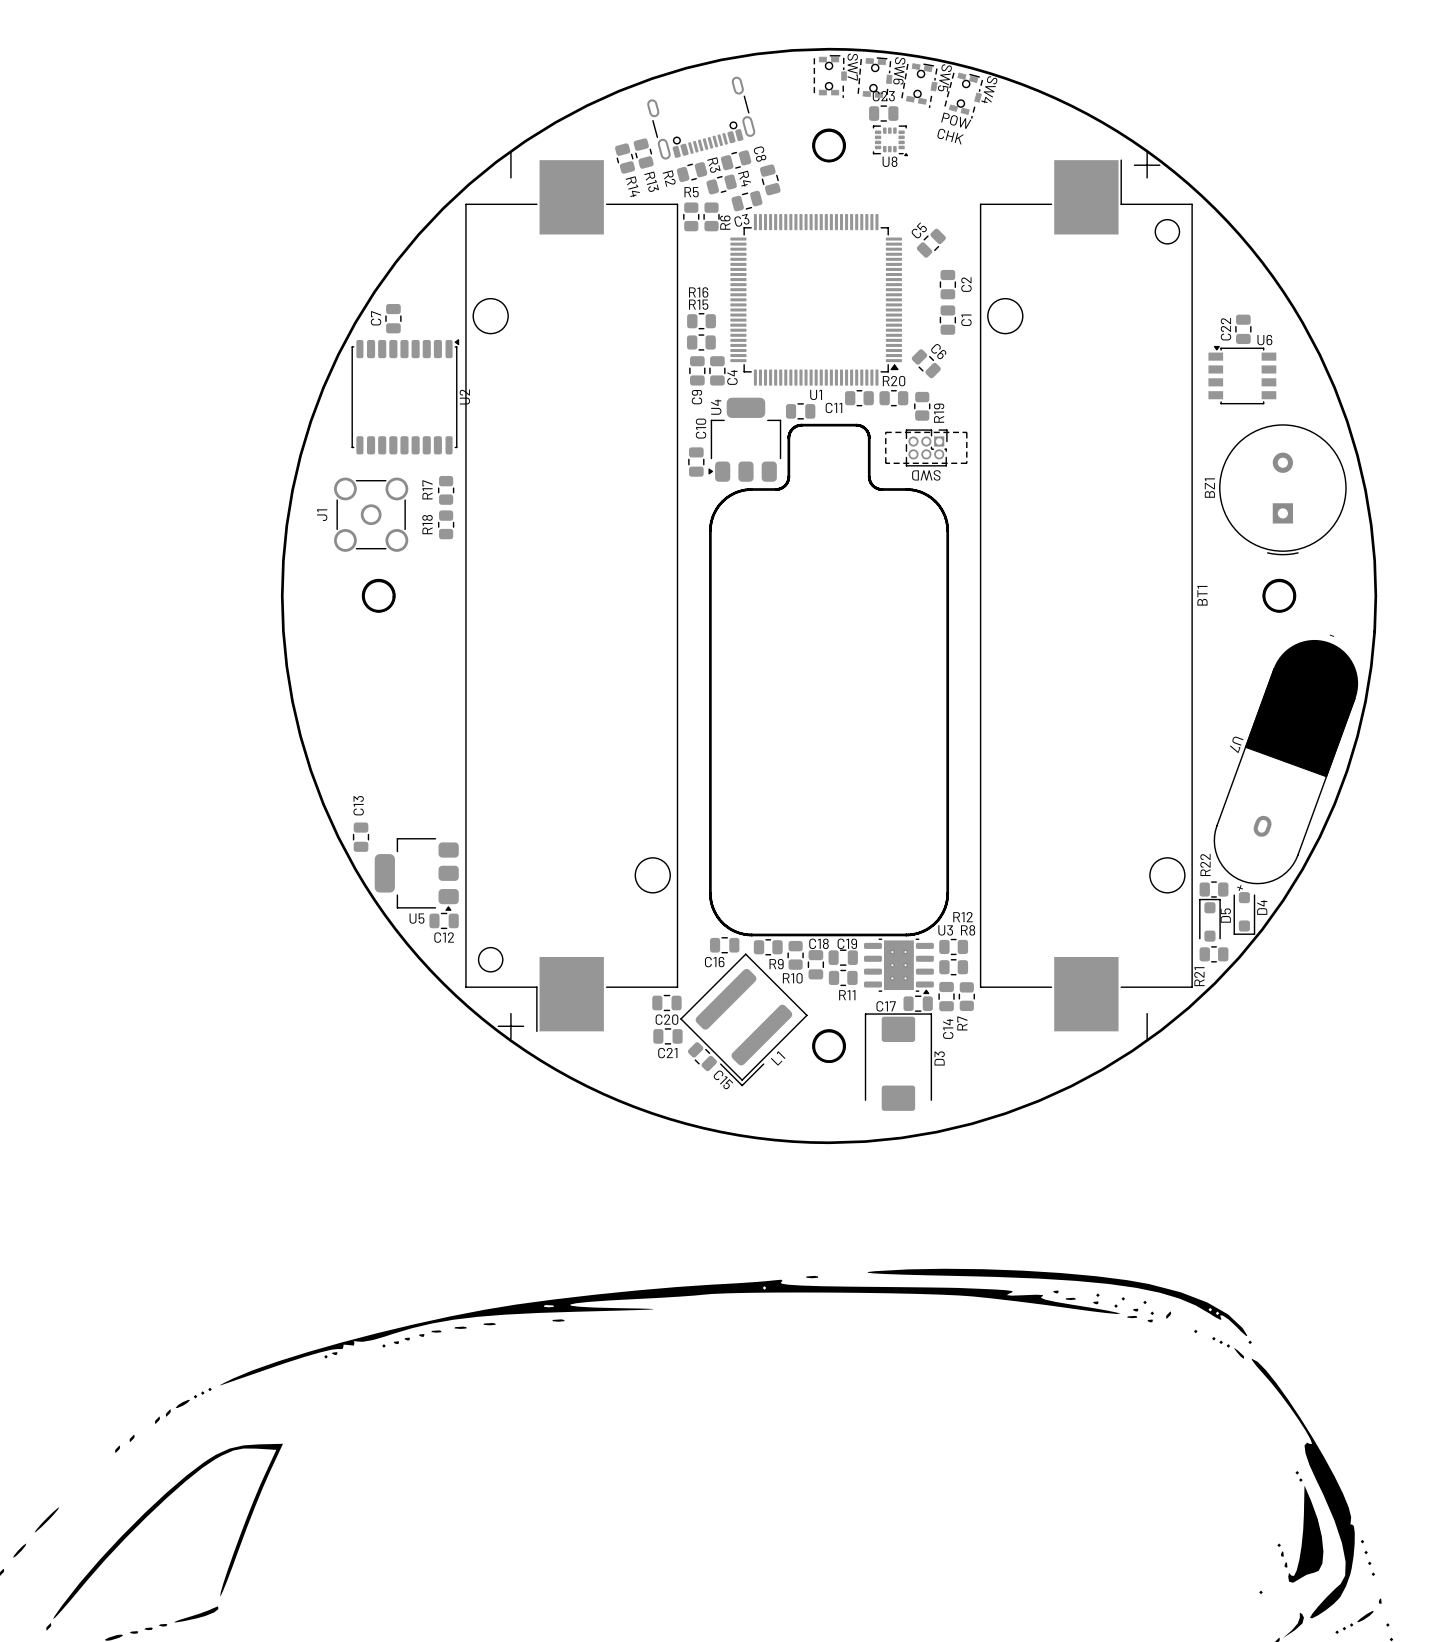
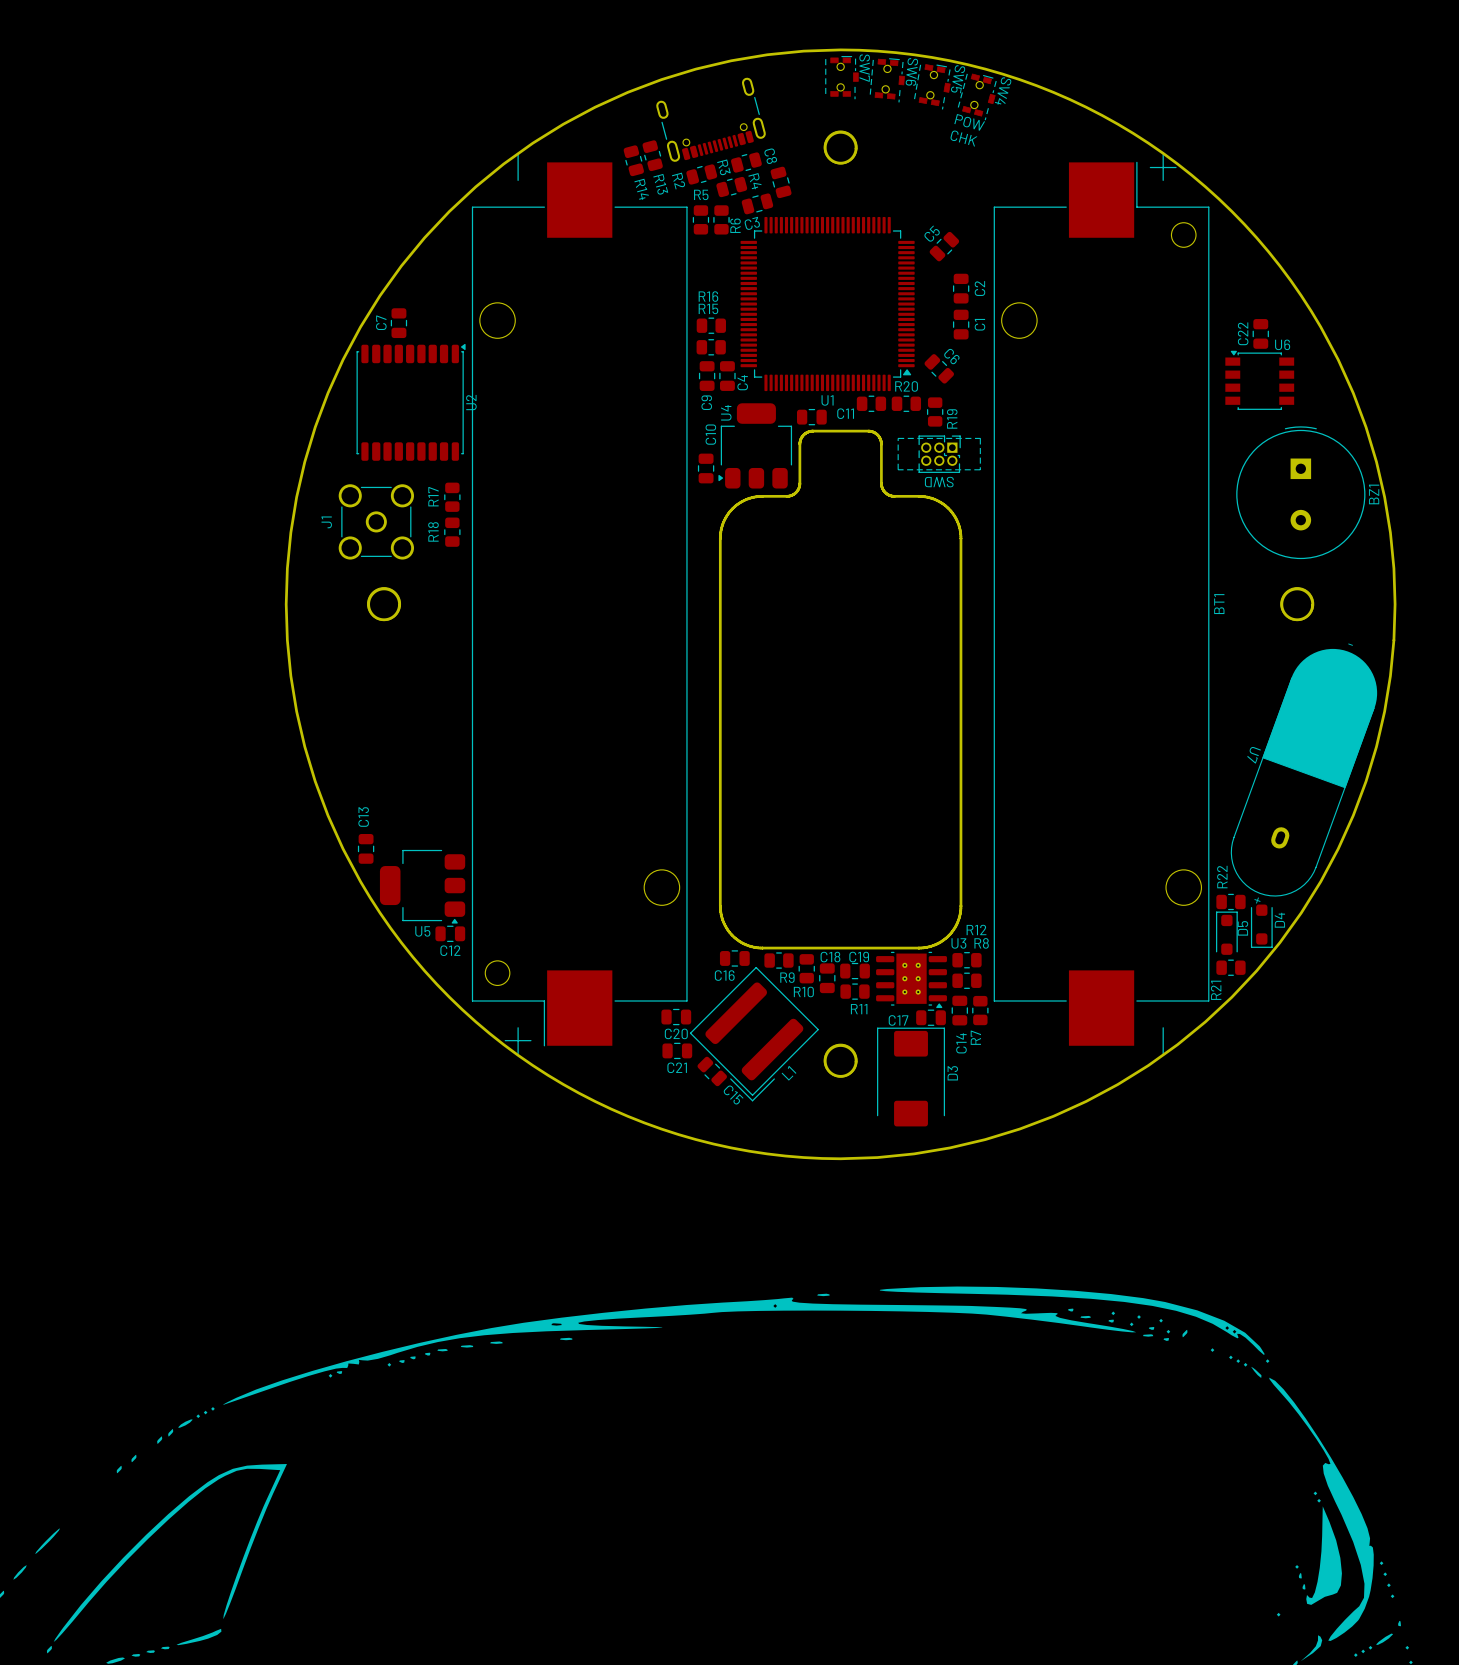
C23: (883, 113) -> none
U8: (890, 140) -> none
BZ1 rotation: 0° (1282, 489) -> 180° (1300, 492)

